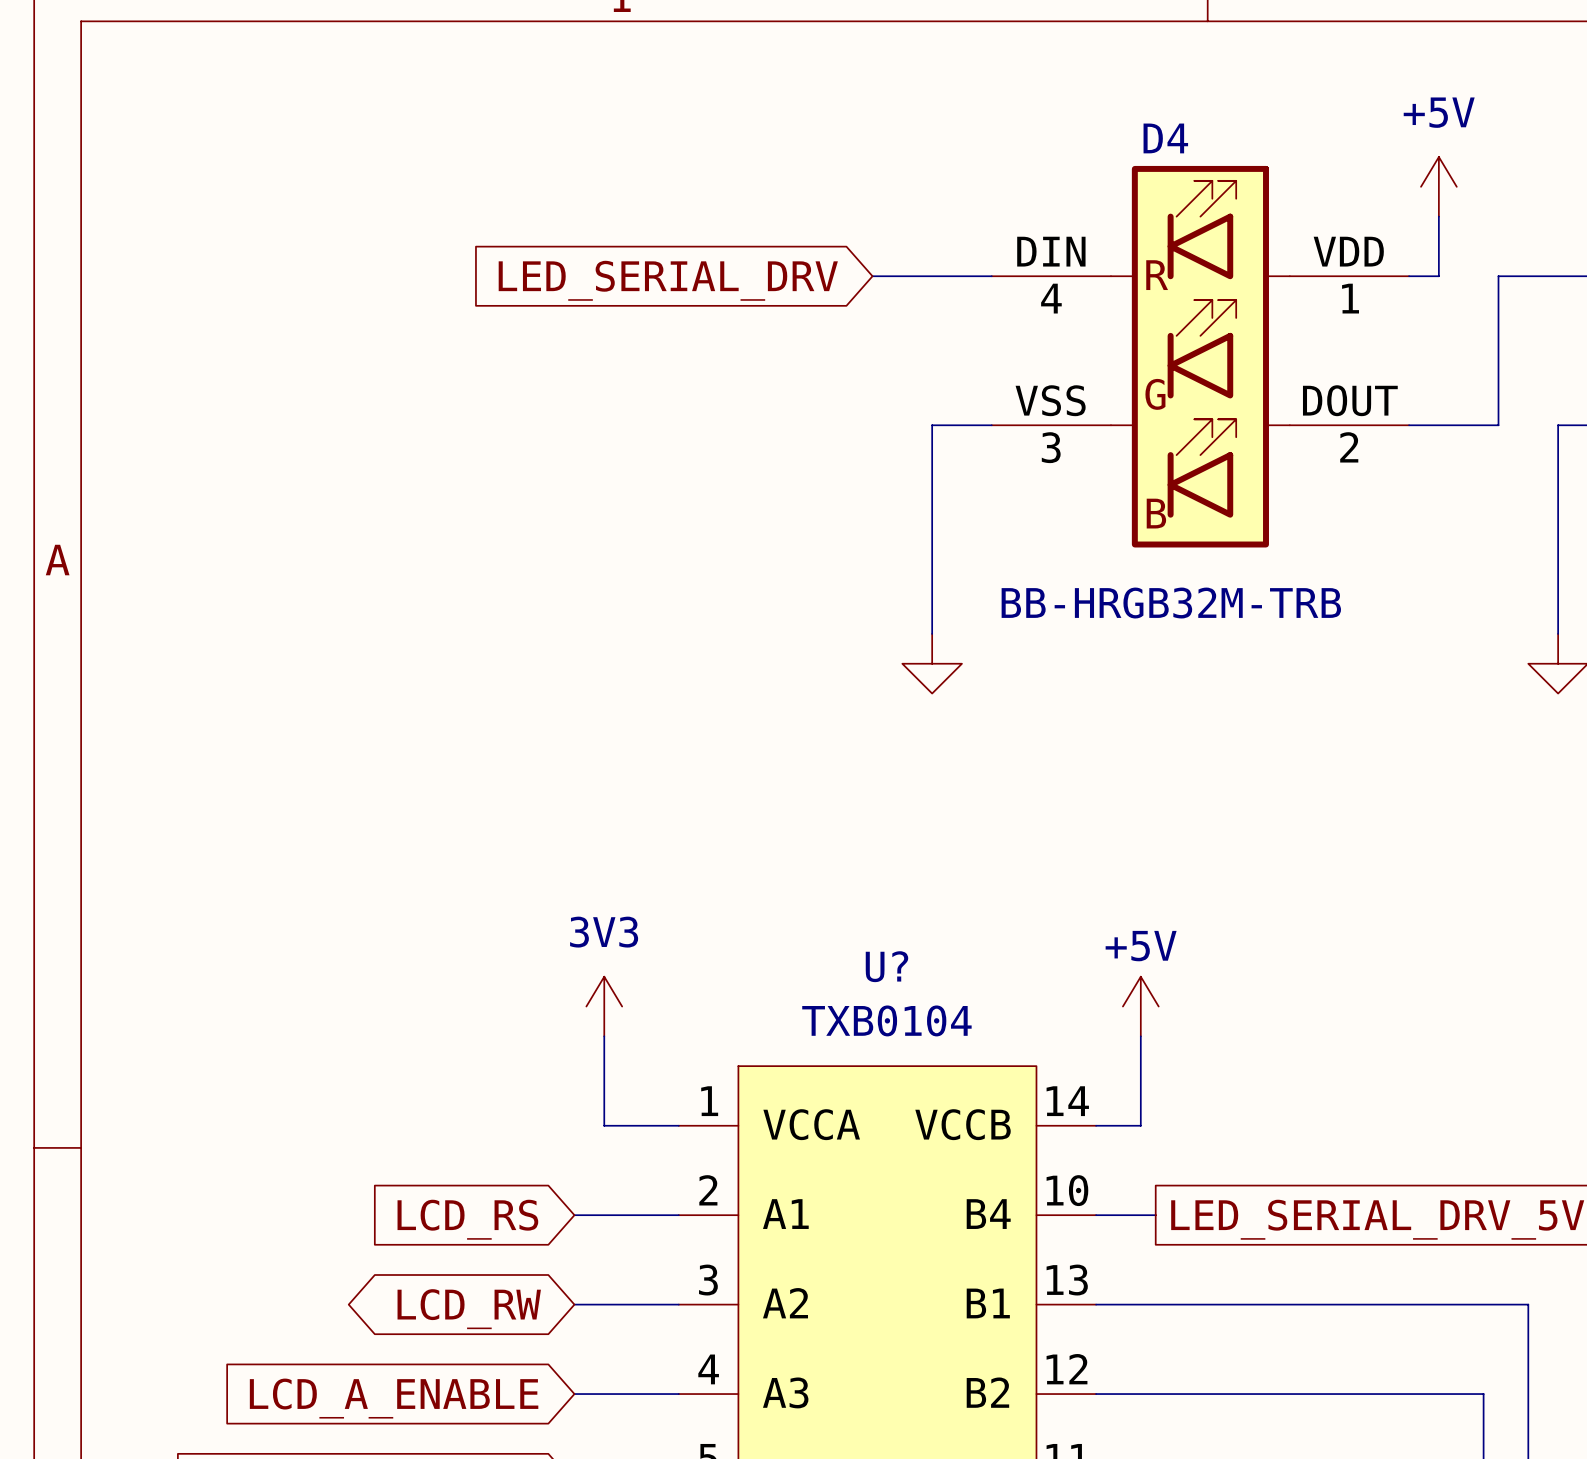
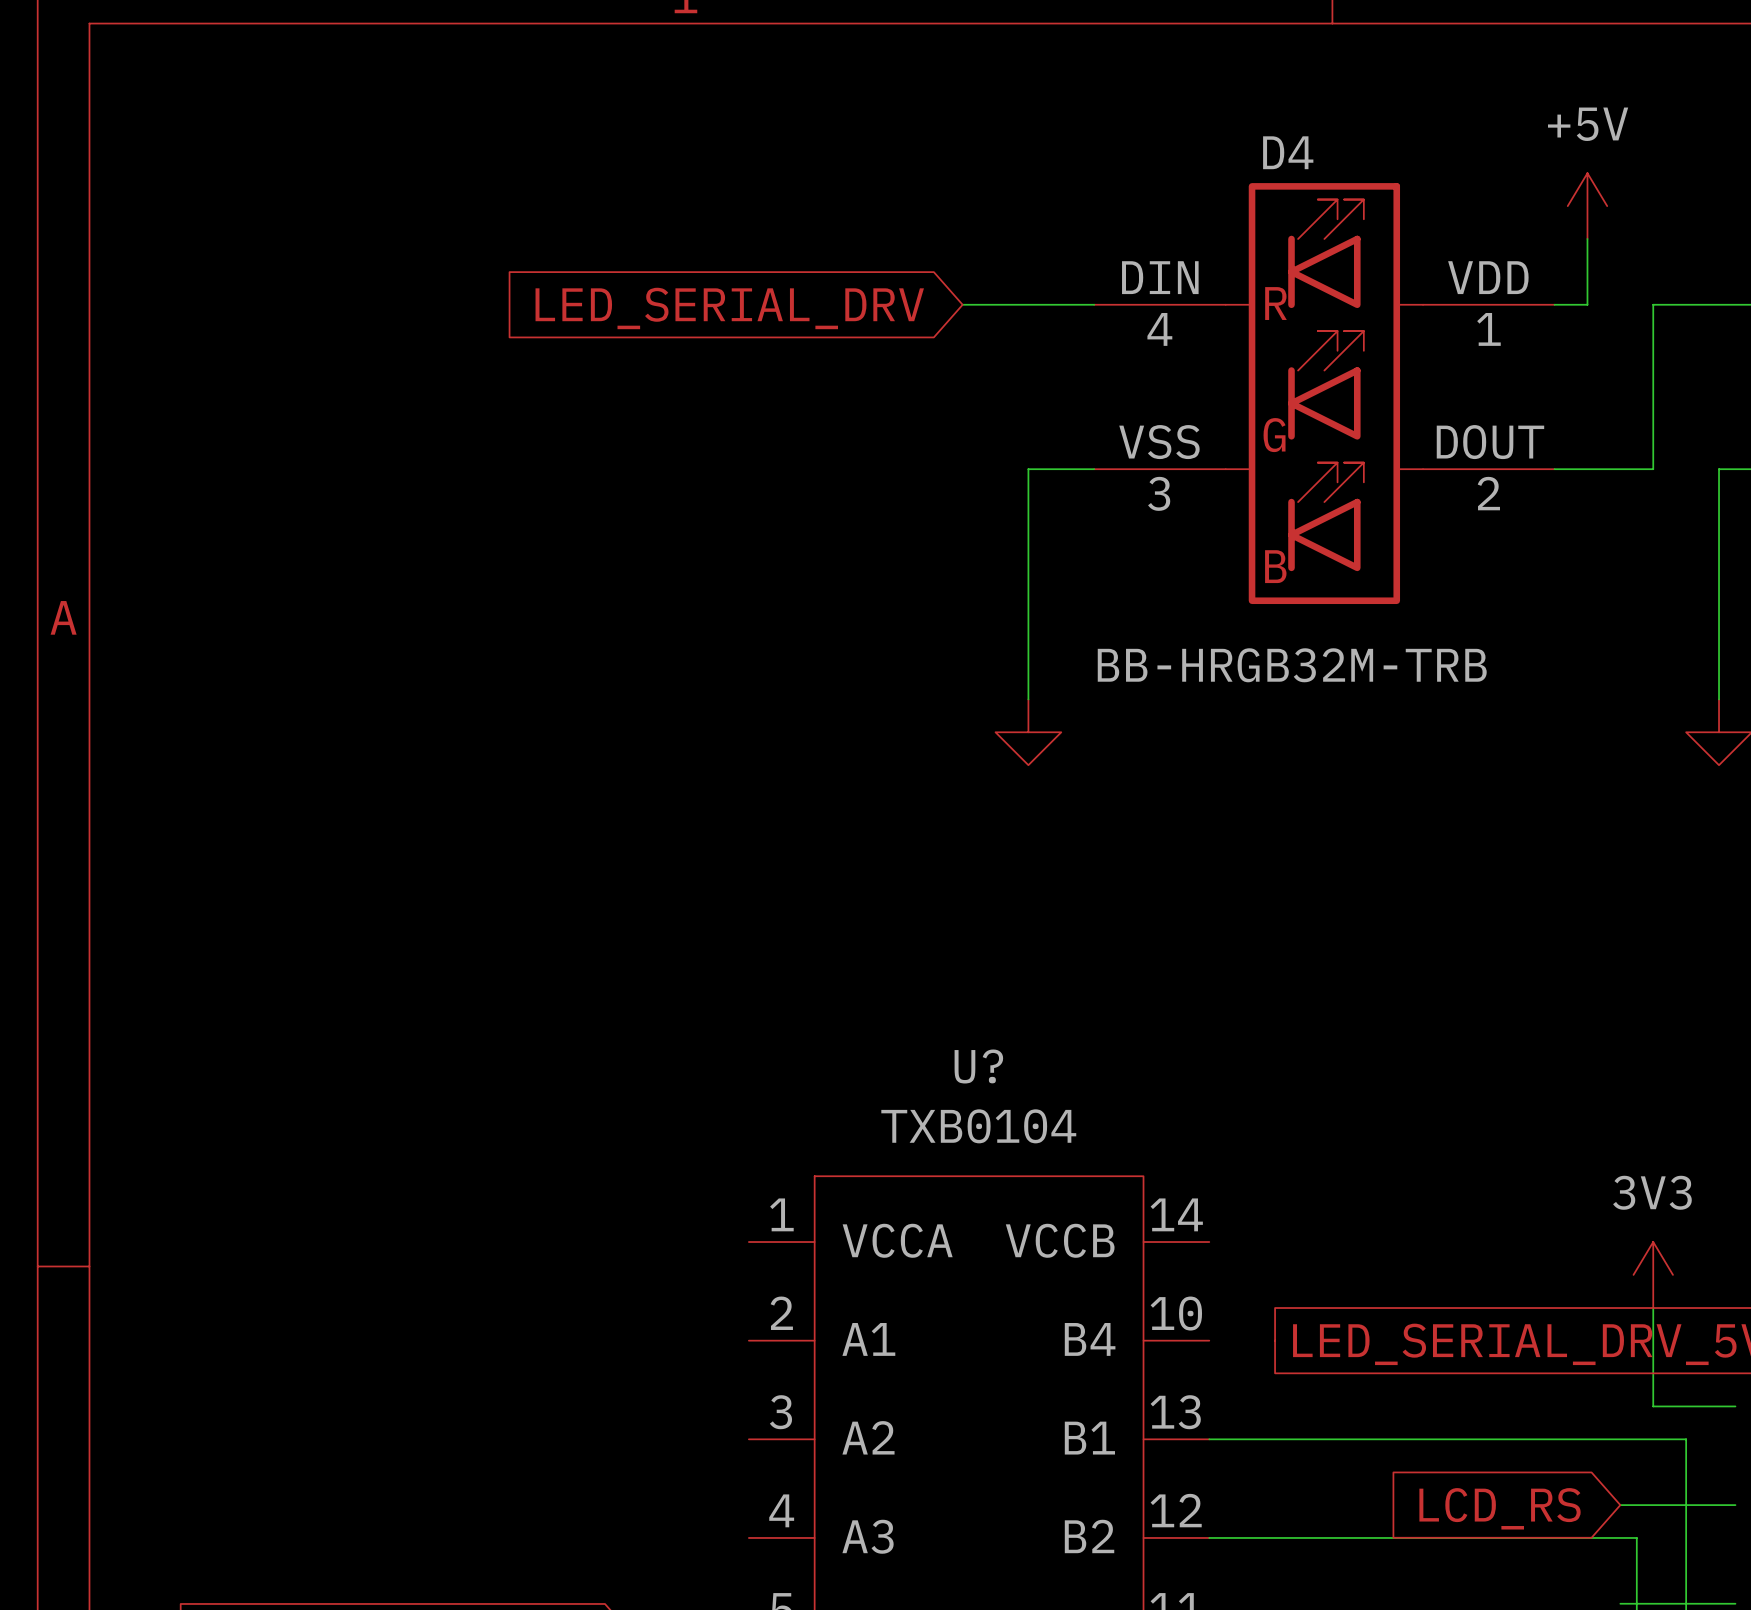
power symbol: 3V3 (604, 1006) -> none
power symbol: +5V (1140, 1006) -> none
wire: (604, 1036) (604, 1125) (678, 1125) -> none
wire: (1140, 1036) (1140, 1125) (1096, 1125) -> none
power symbol: none -> 3V3 (1653, 1274)
wire: none -> (1653, 1307) (1653, 1406) (1735, 1406)
wire: (574, 1215) (678, 1215) -> none
wire: (1096, 1215) (1155, 1215) -> none
global label: LCD_RS (467, 1219) -> none
wire: (574, 1304) (678, 1304) -> none
global label: LCD_RW (469, 1309) -> none
wire: none -> (1620, 1505) (1735, 1505)
global label: none -> LCD_RS (1500, 1508)
wire: (574, 1394) (678, 1394) -> none
global label: LCD_A_ENABLE (394, 1398) -> none
wire: none -> (1620, 1603) (1735, 1603)

